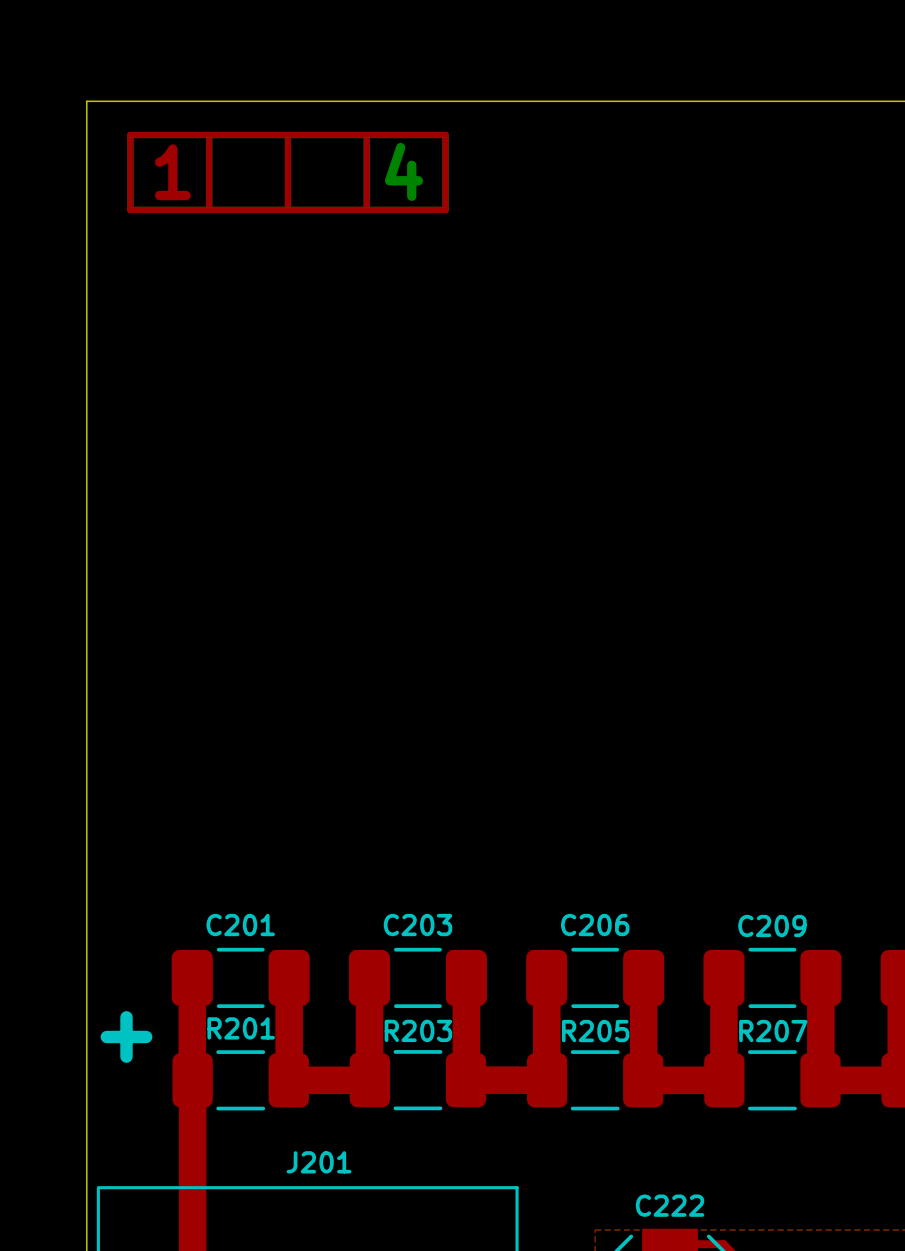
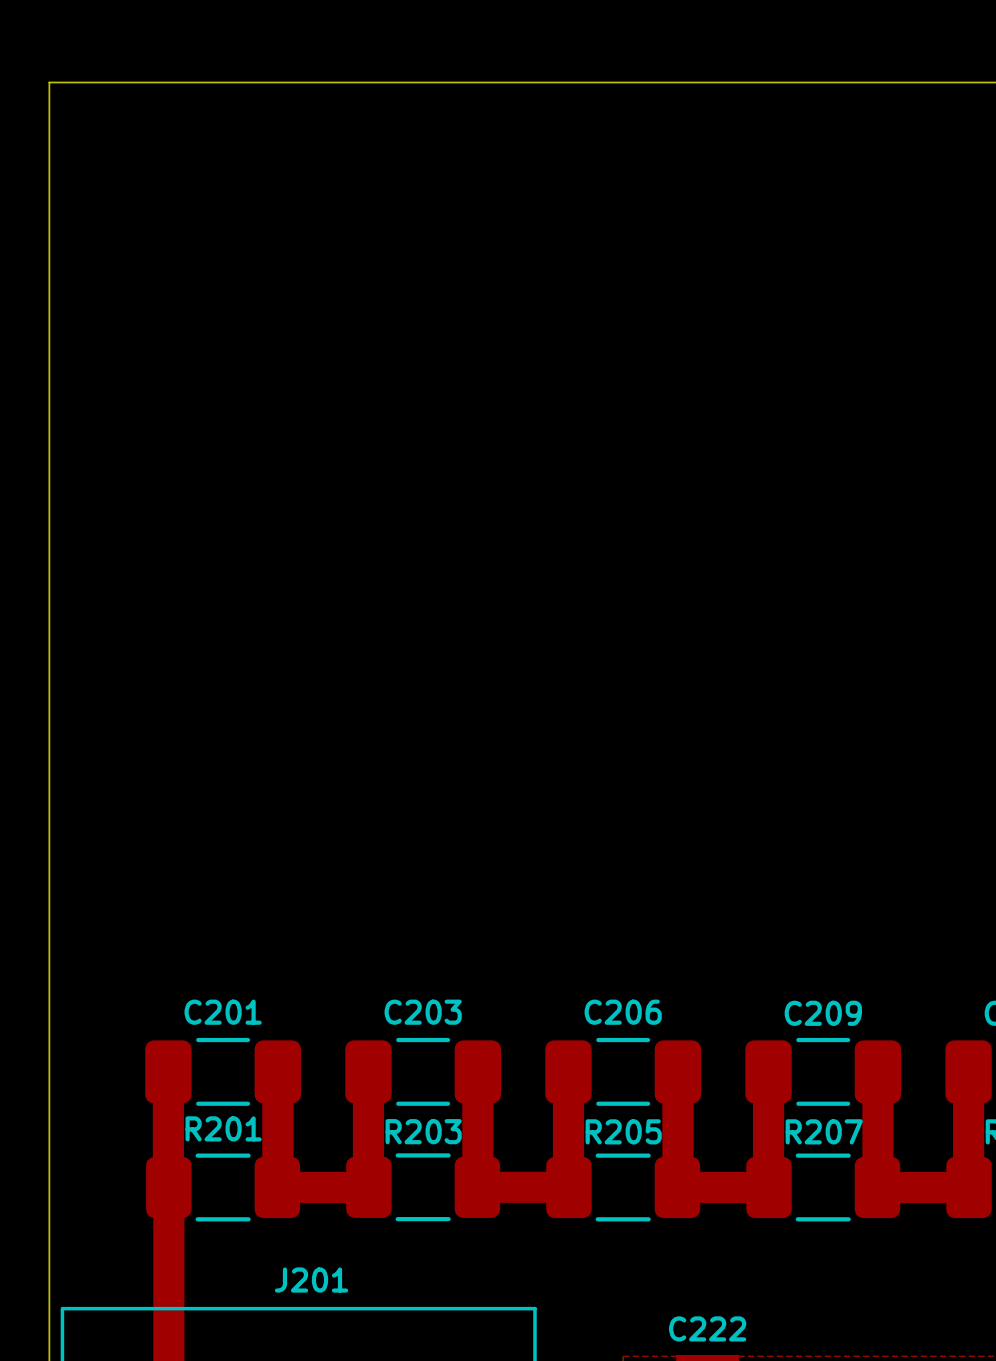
top track: (130, 135) (130, 209) (445, 209) (445, 135) (130, 135) -> none
top track: (209, 135) (209, 209) -> none
top track: (287, 135) (287, 209) -> none
top track: (366, 135) (366, 209) -> none
text: 4 (404, 171) -> none
text: 1 (172, 172) -> none
line: (126, 1017) (126, 1056) -> none
line: (106, 1036) (146, 1036) -> none

